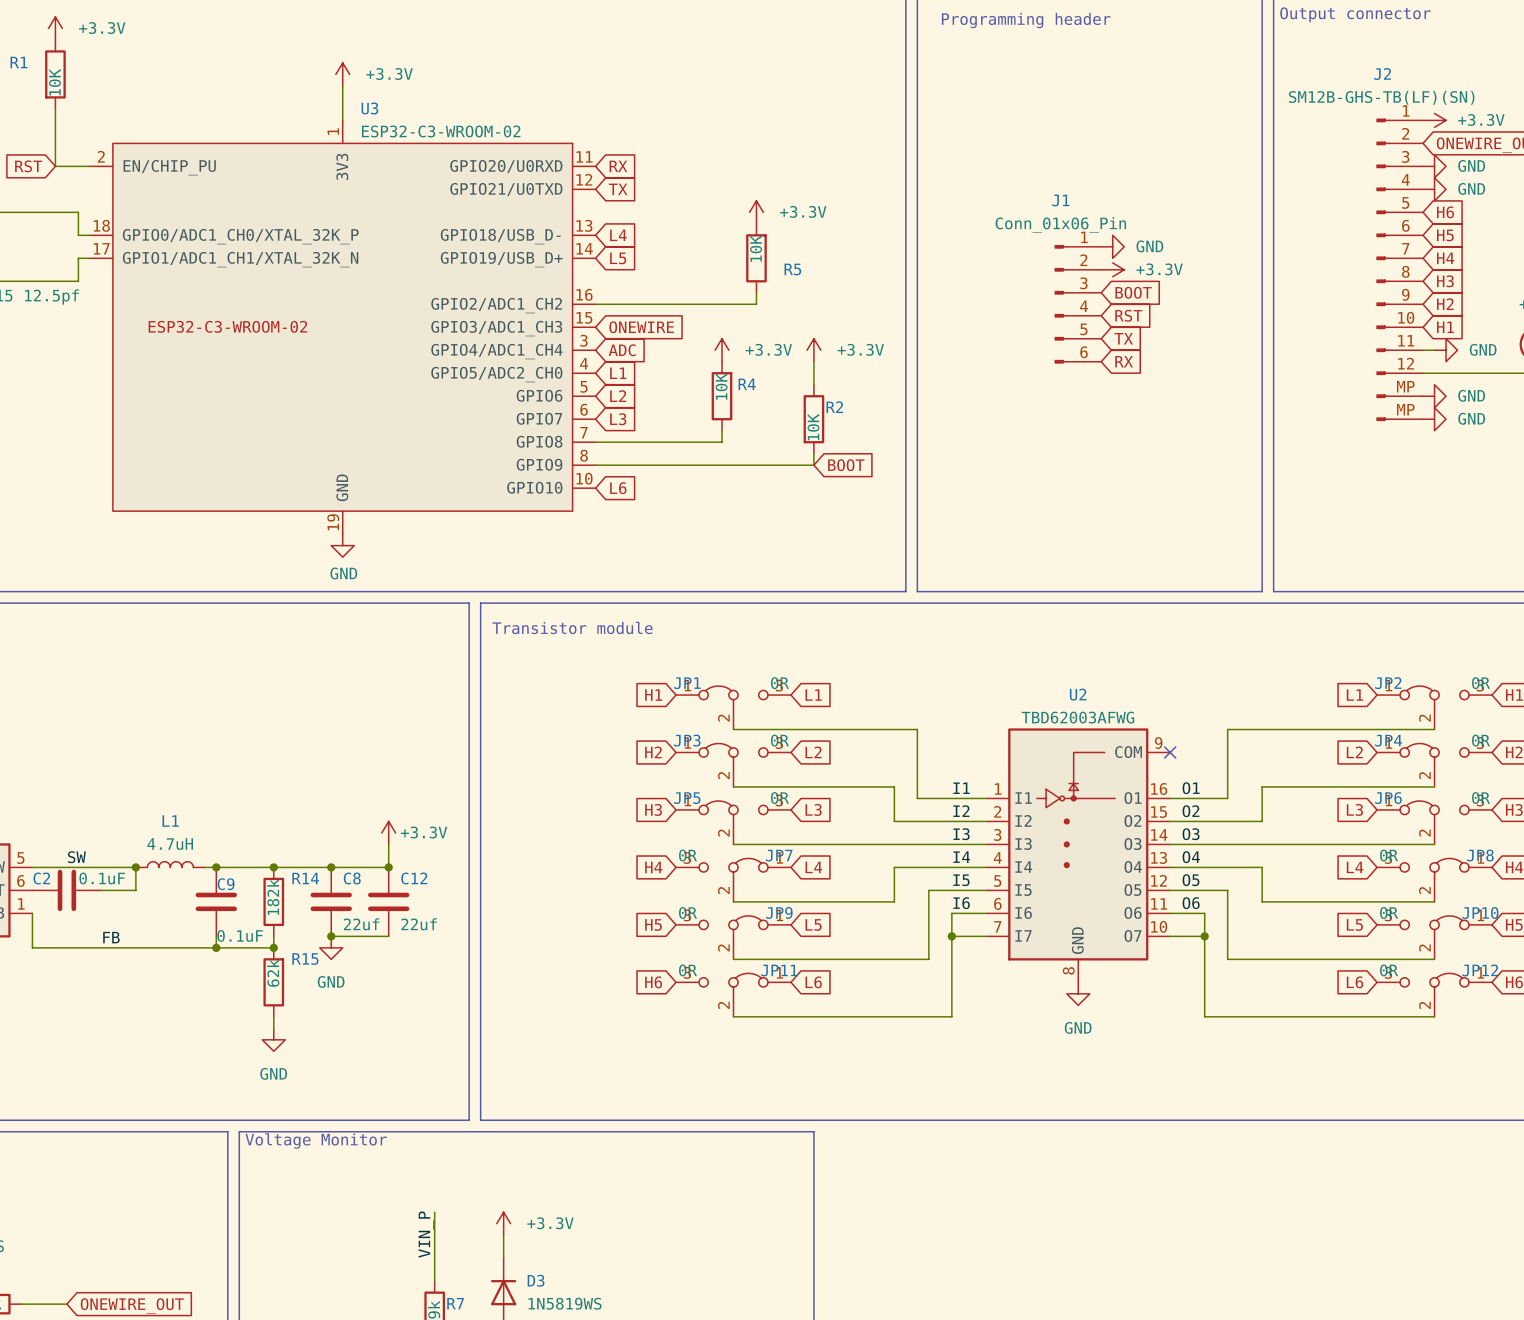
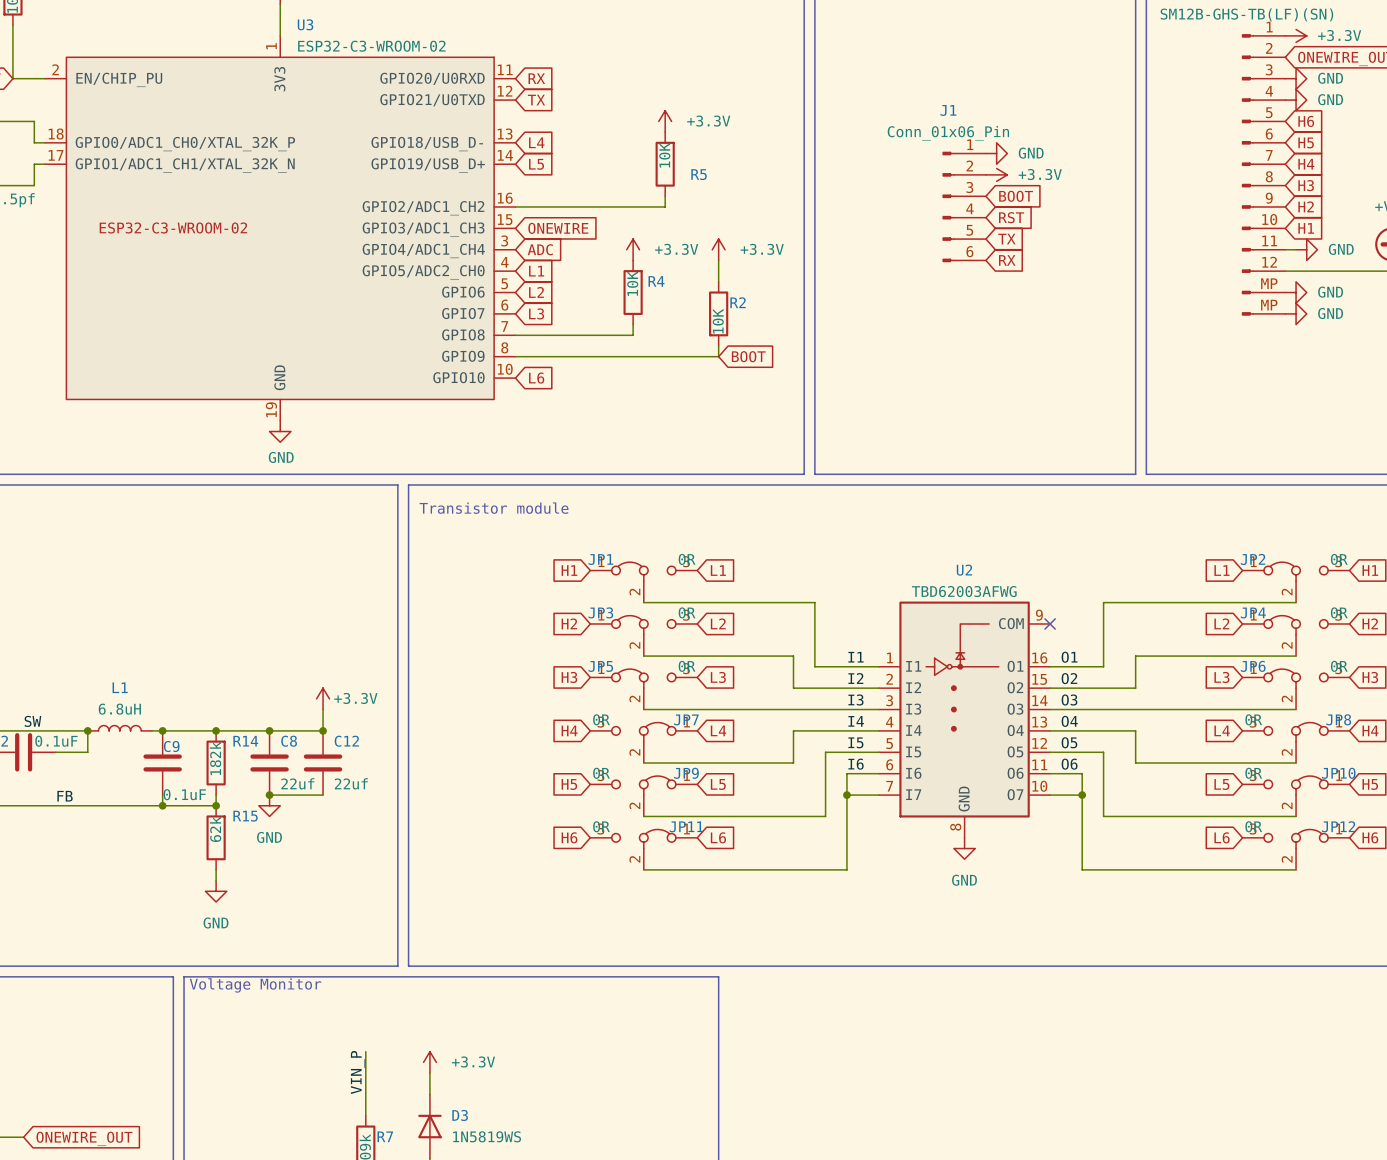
L1 value: 4.7uH (170, 844) -> 6.8uH (119, 709)

